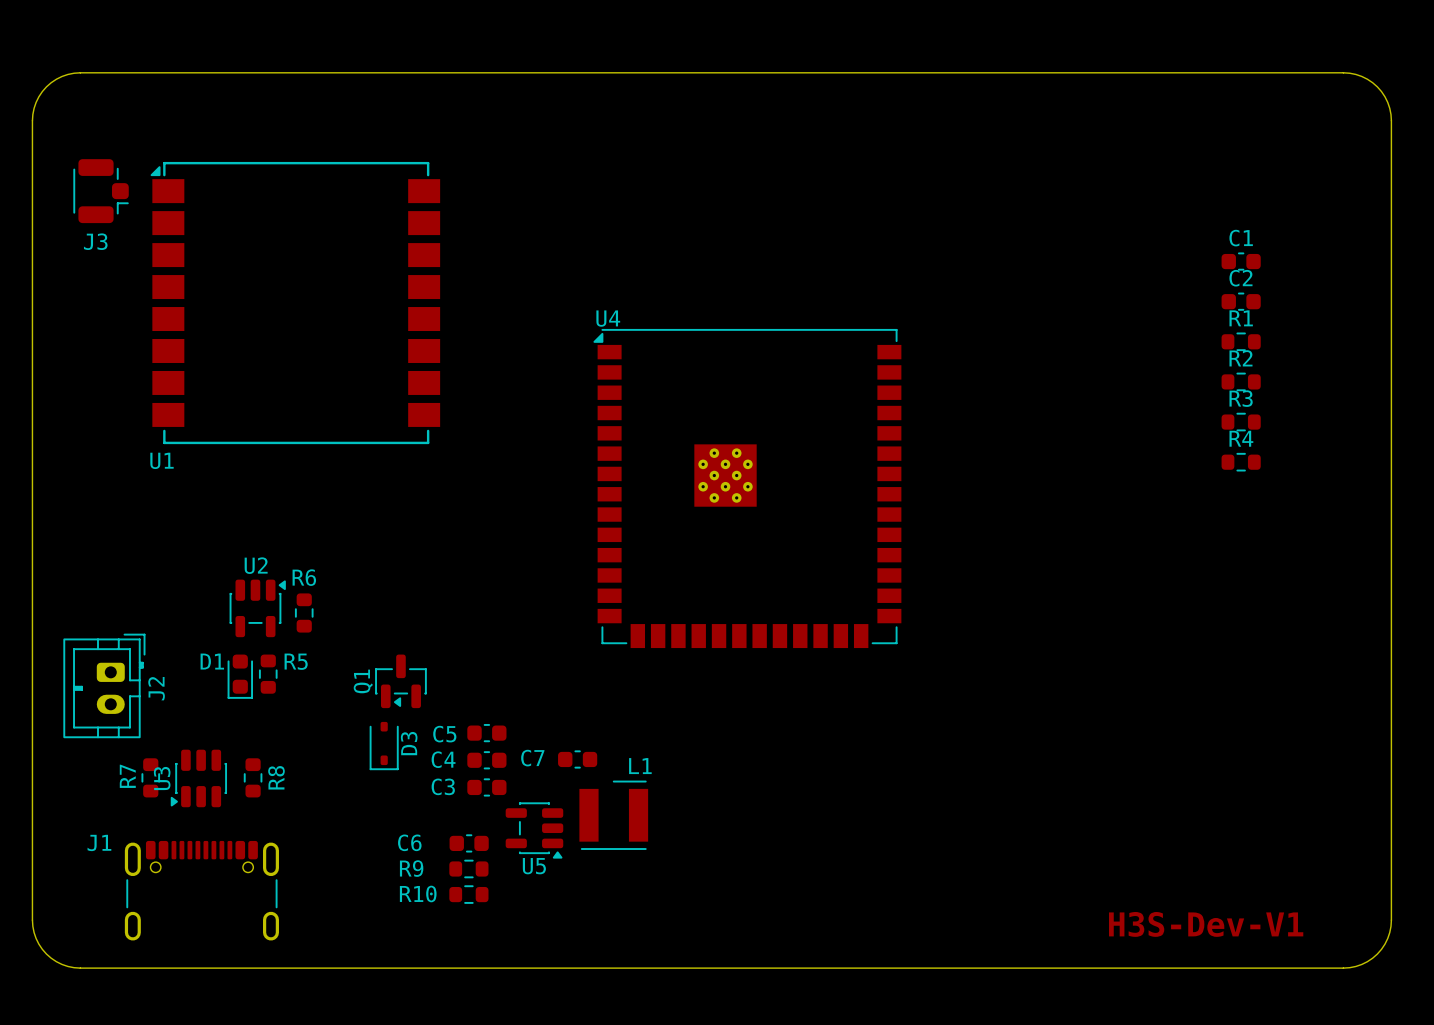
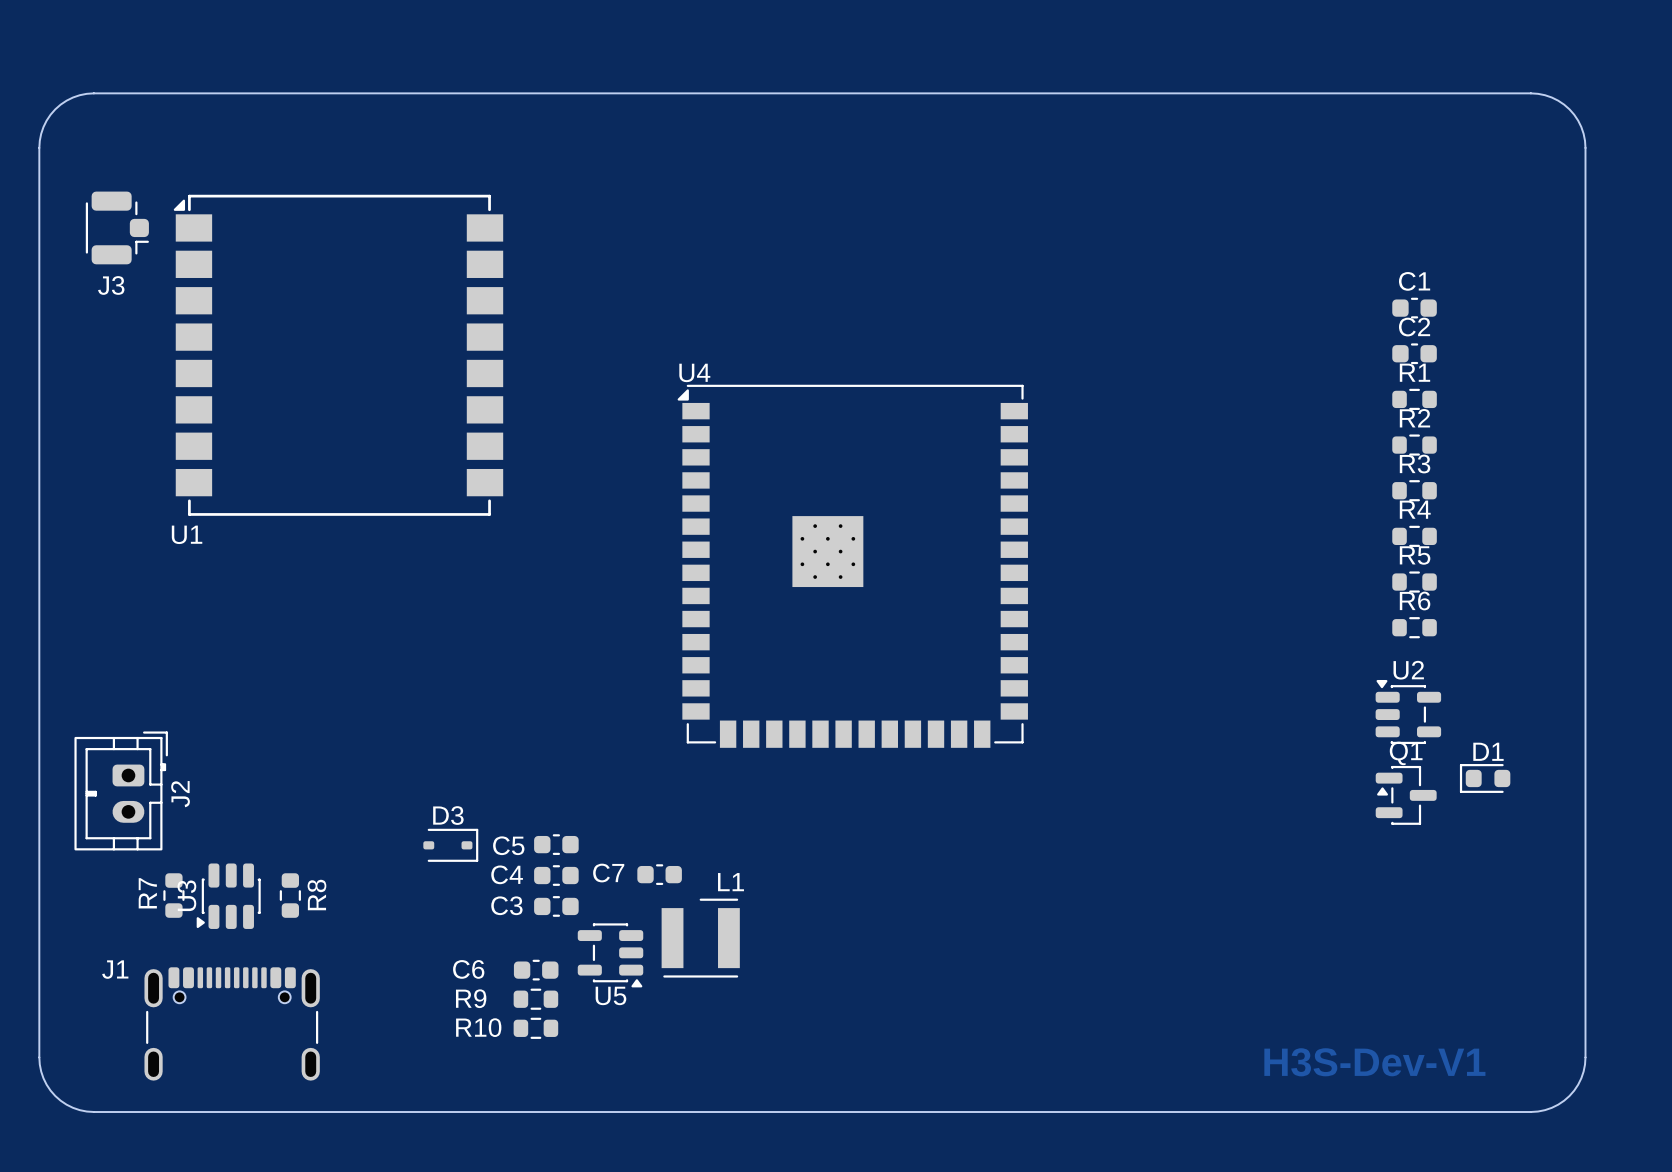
U2 rotation: 0° (257, 608) -> 90° counterclockwise (1408, 712)
U2 position: (257, 608) -> (1408, 712)
R6 rotation: 0° (304, 612) -> 90° clockwise (1414, 627)
R6 position: (304, 612) -> (1414, 627)
R5 rotation: 0° (268, 674) -> 90° clockwise (1414, 582)
R5 position: (268, 674) -> (1414, 582)
D1 rotation: 0° (240, 676) -> 90° clockwise (1485, 778)
D1 position: (240, 676) -> (1485, 778)
Q1 rotation: 0° (400, 681) -> 90° clockwise (1406, 795)
Q1 position: (400, 681) -> (1406, 795)
D3 rotation: 0° (384, 746) -> 90° counterclockwise (450, 845)

